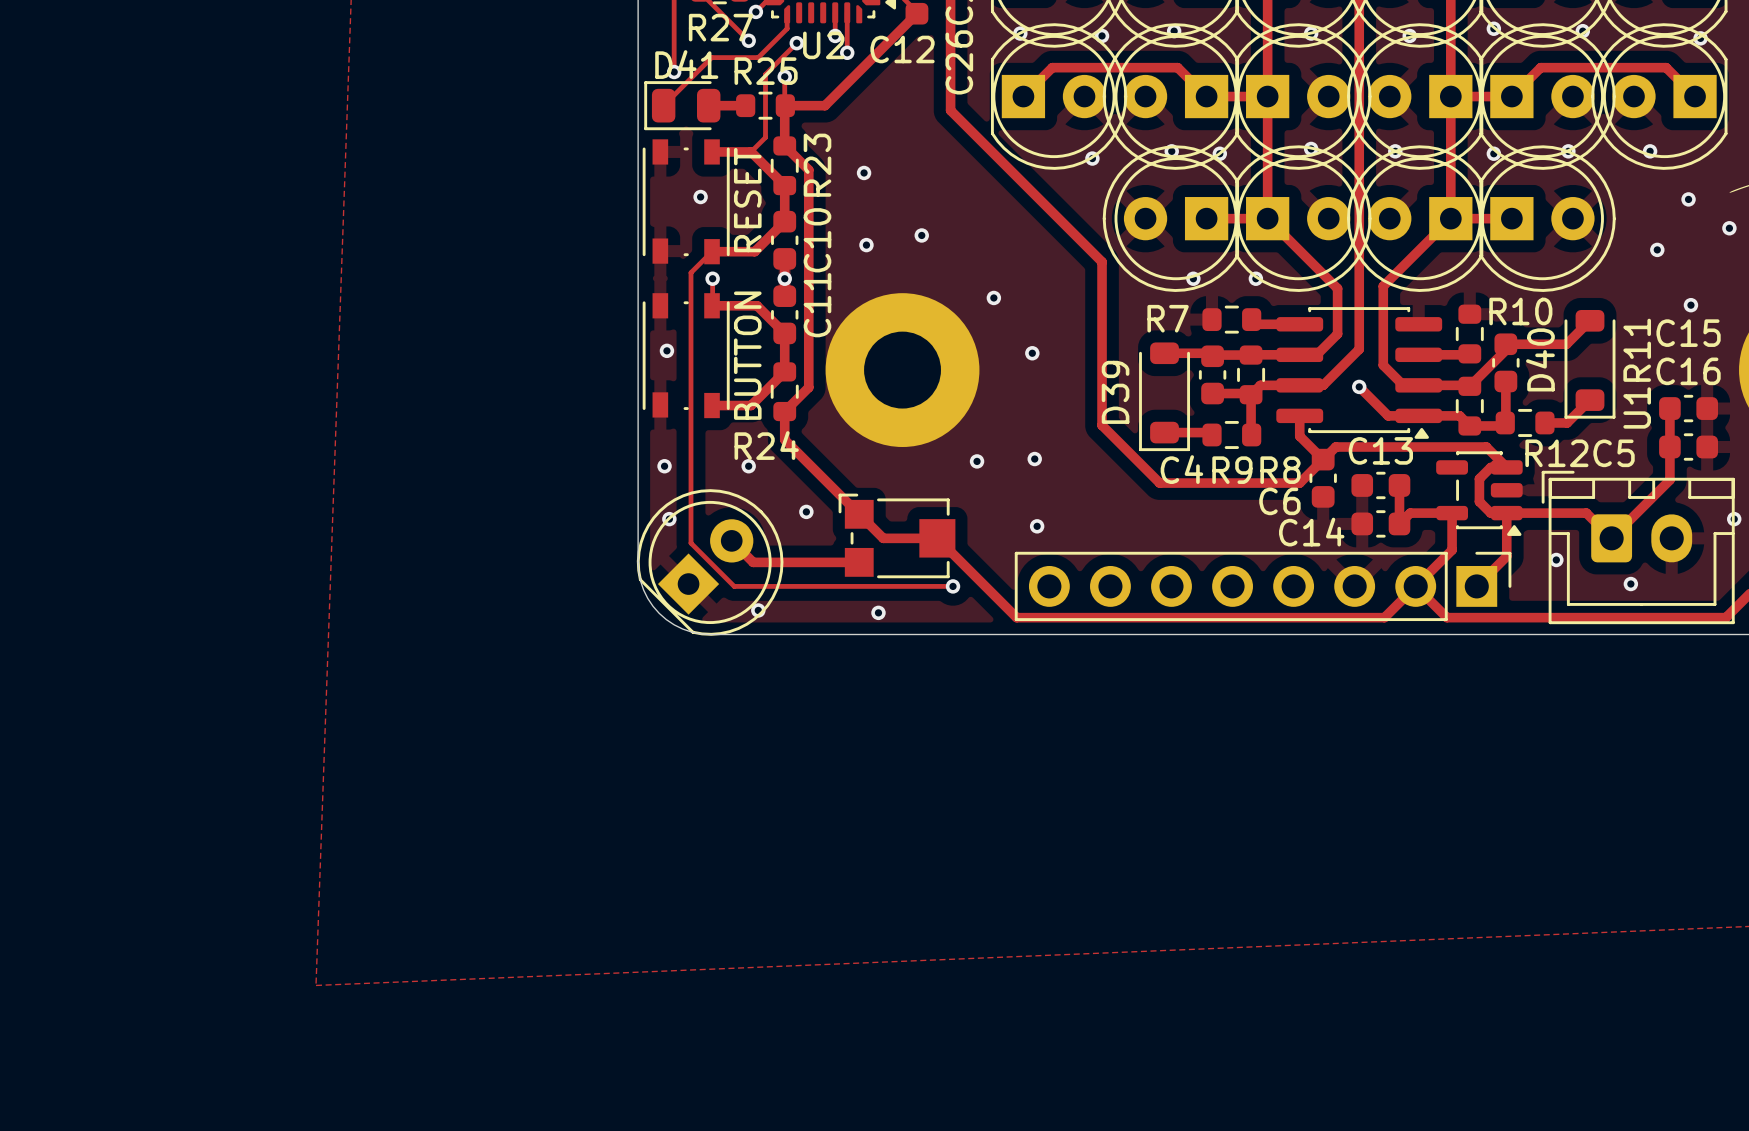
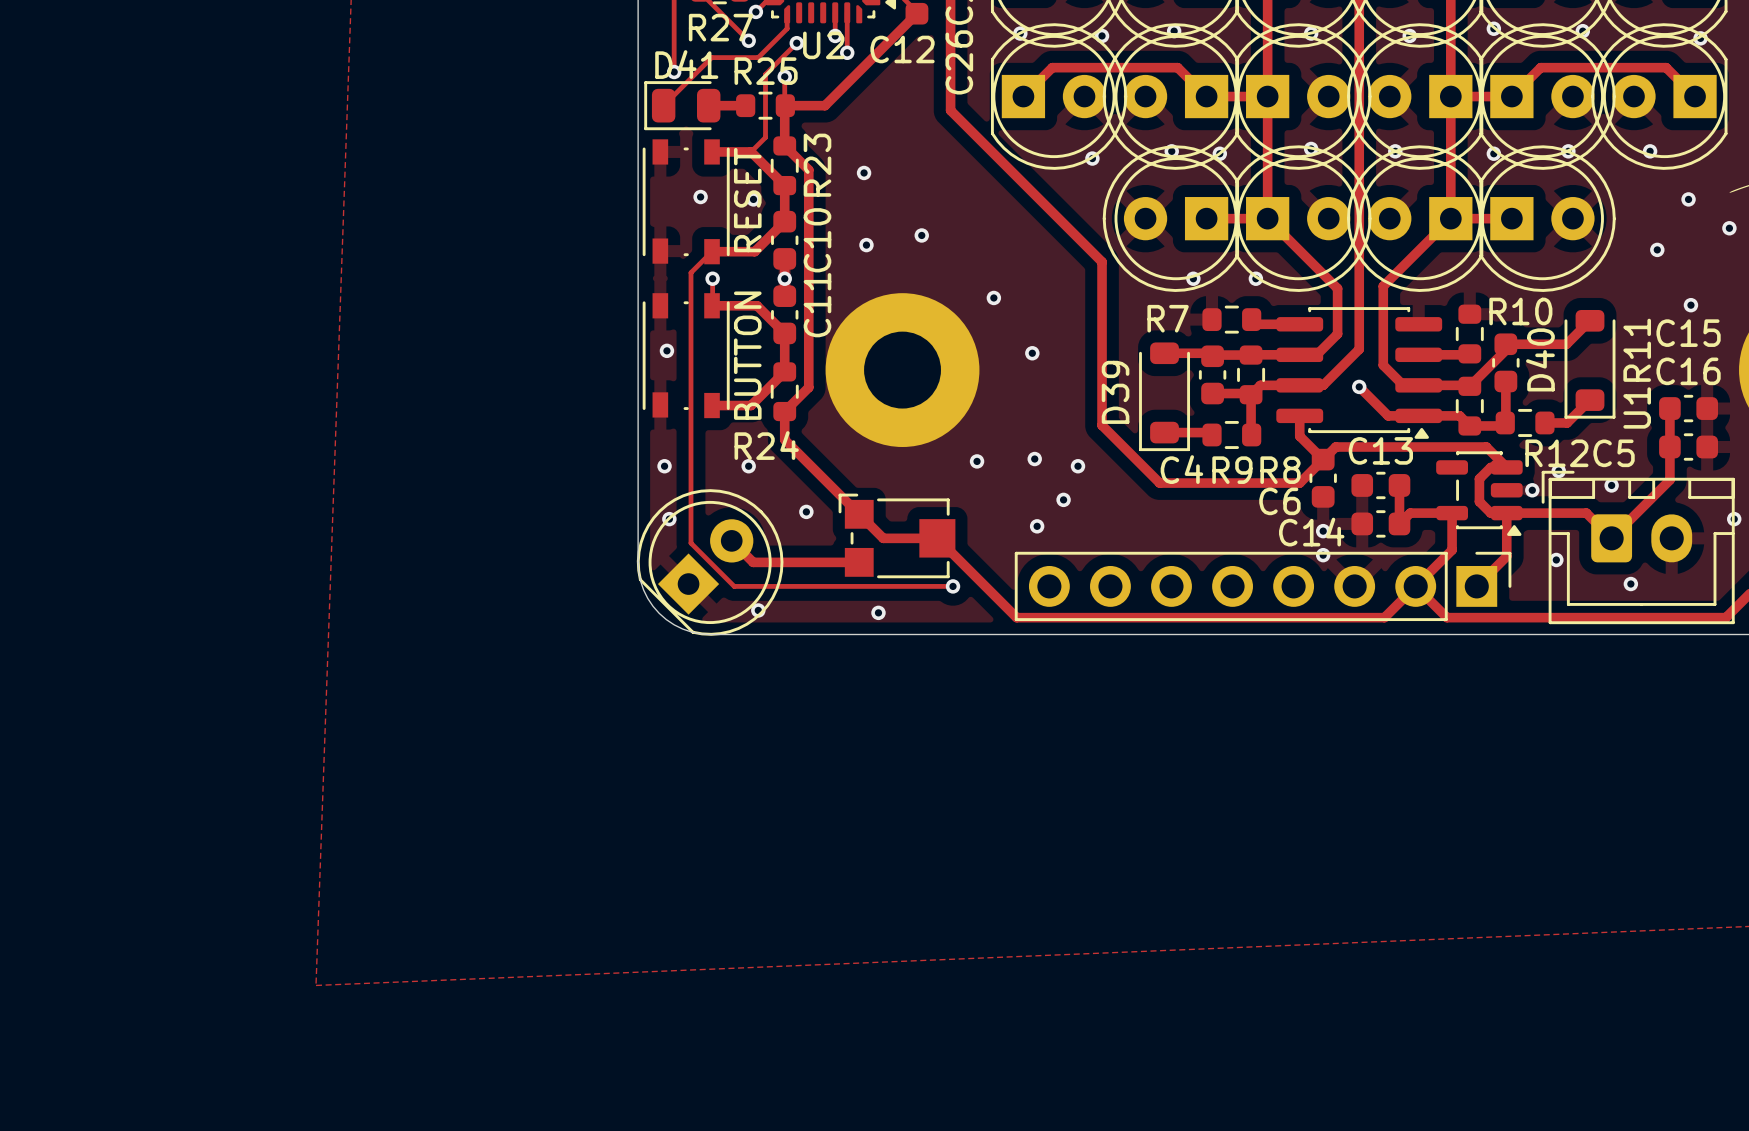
via: none -> (753, 199)
via: none -> (1078, 466)
via: none -> (1558, 471)
via: none -> (1611, 485)
via: none -> (1532, 490)
via: none -> (1063, 499)
via: none -> (1323, 531)
via: none -> (1323, 555)

